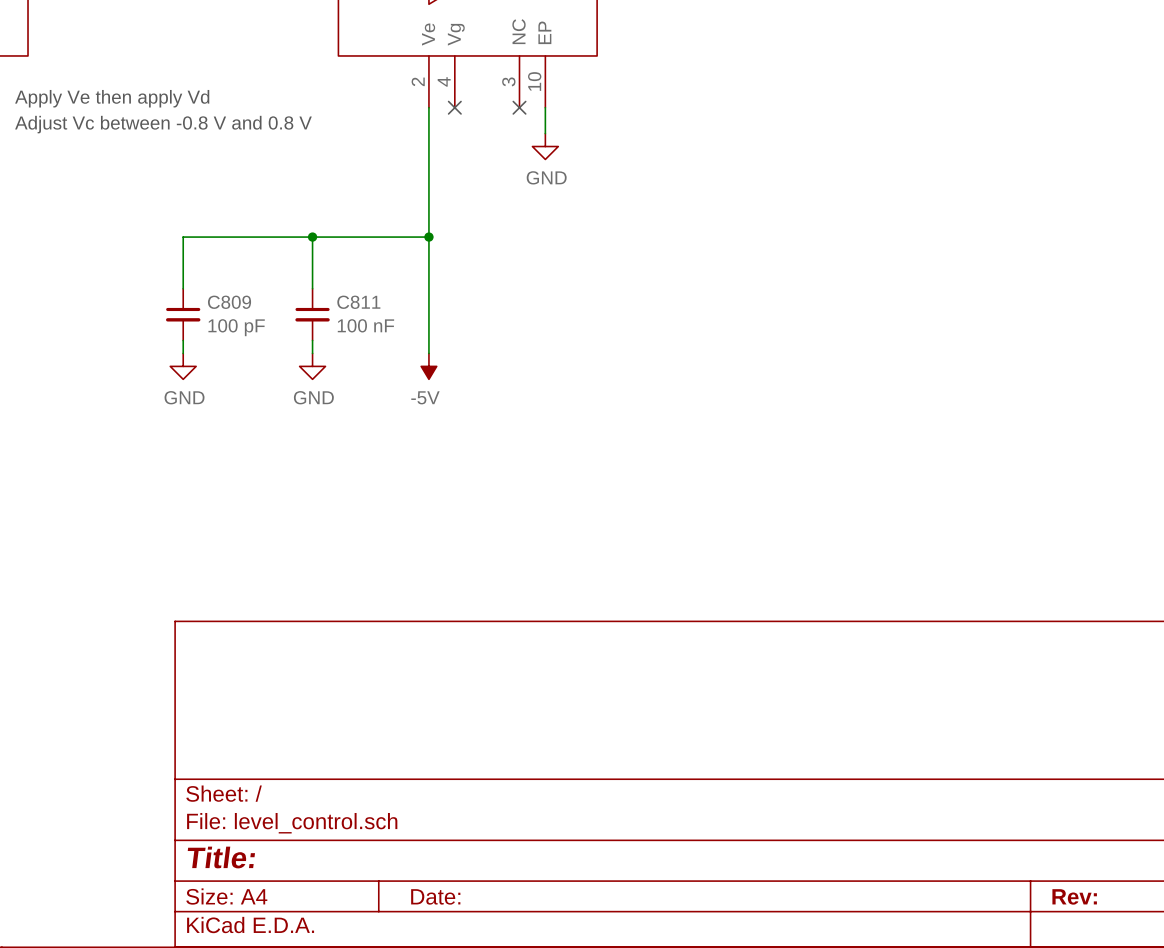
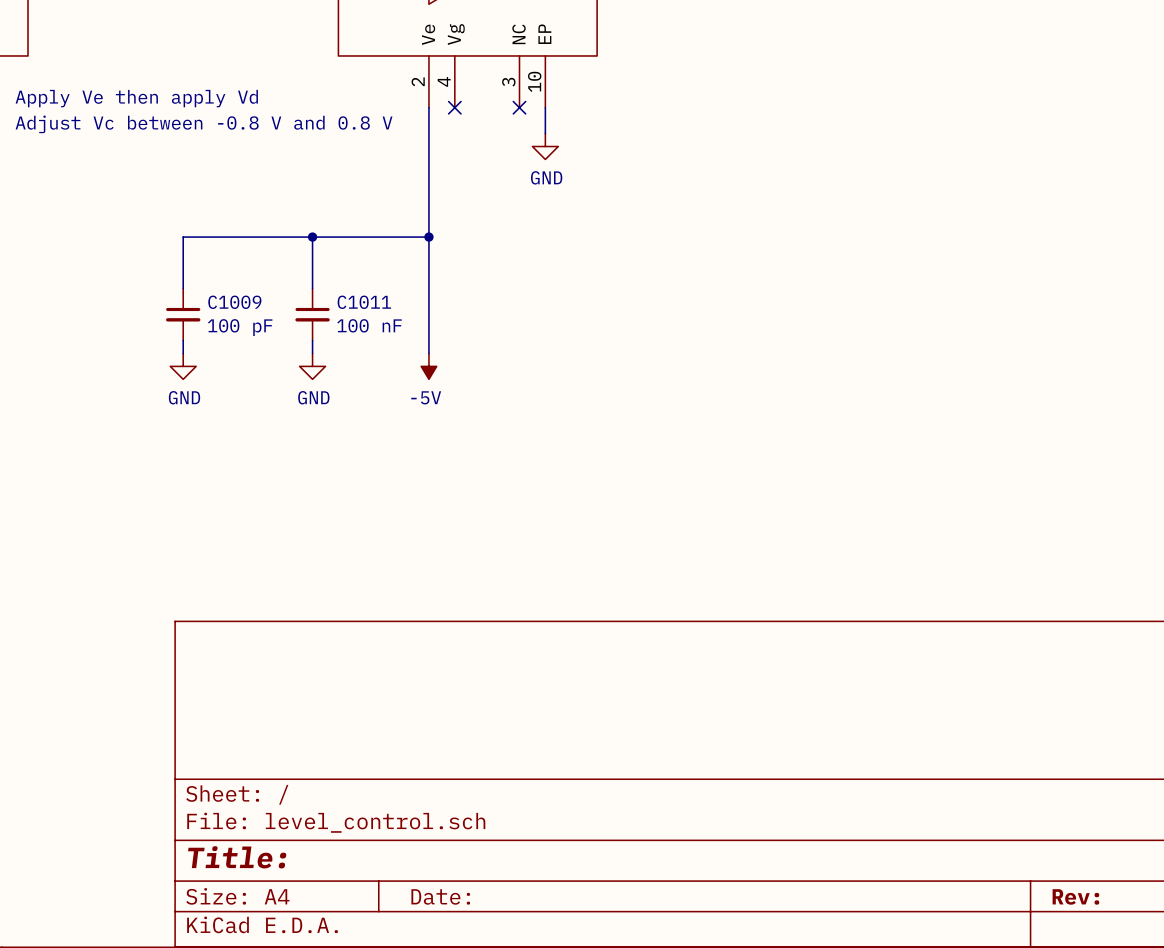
C809 name: C809 (229, 302) -> C1009 (234, 302)
C811 name: C811 (358, 302) -> C1011 (364, 302)

